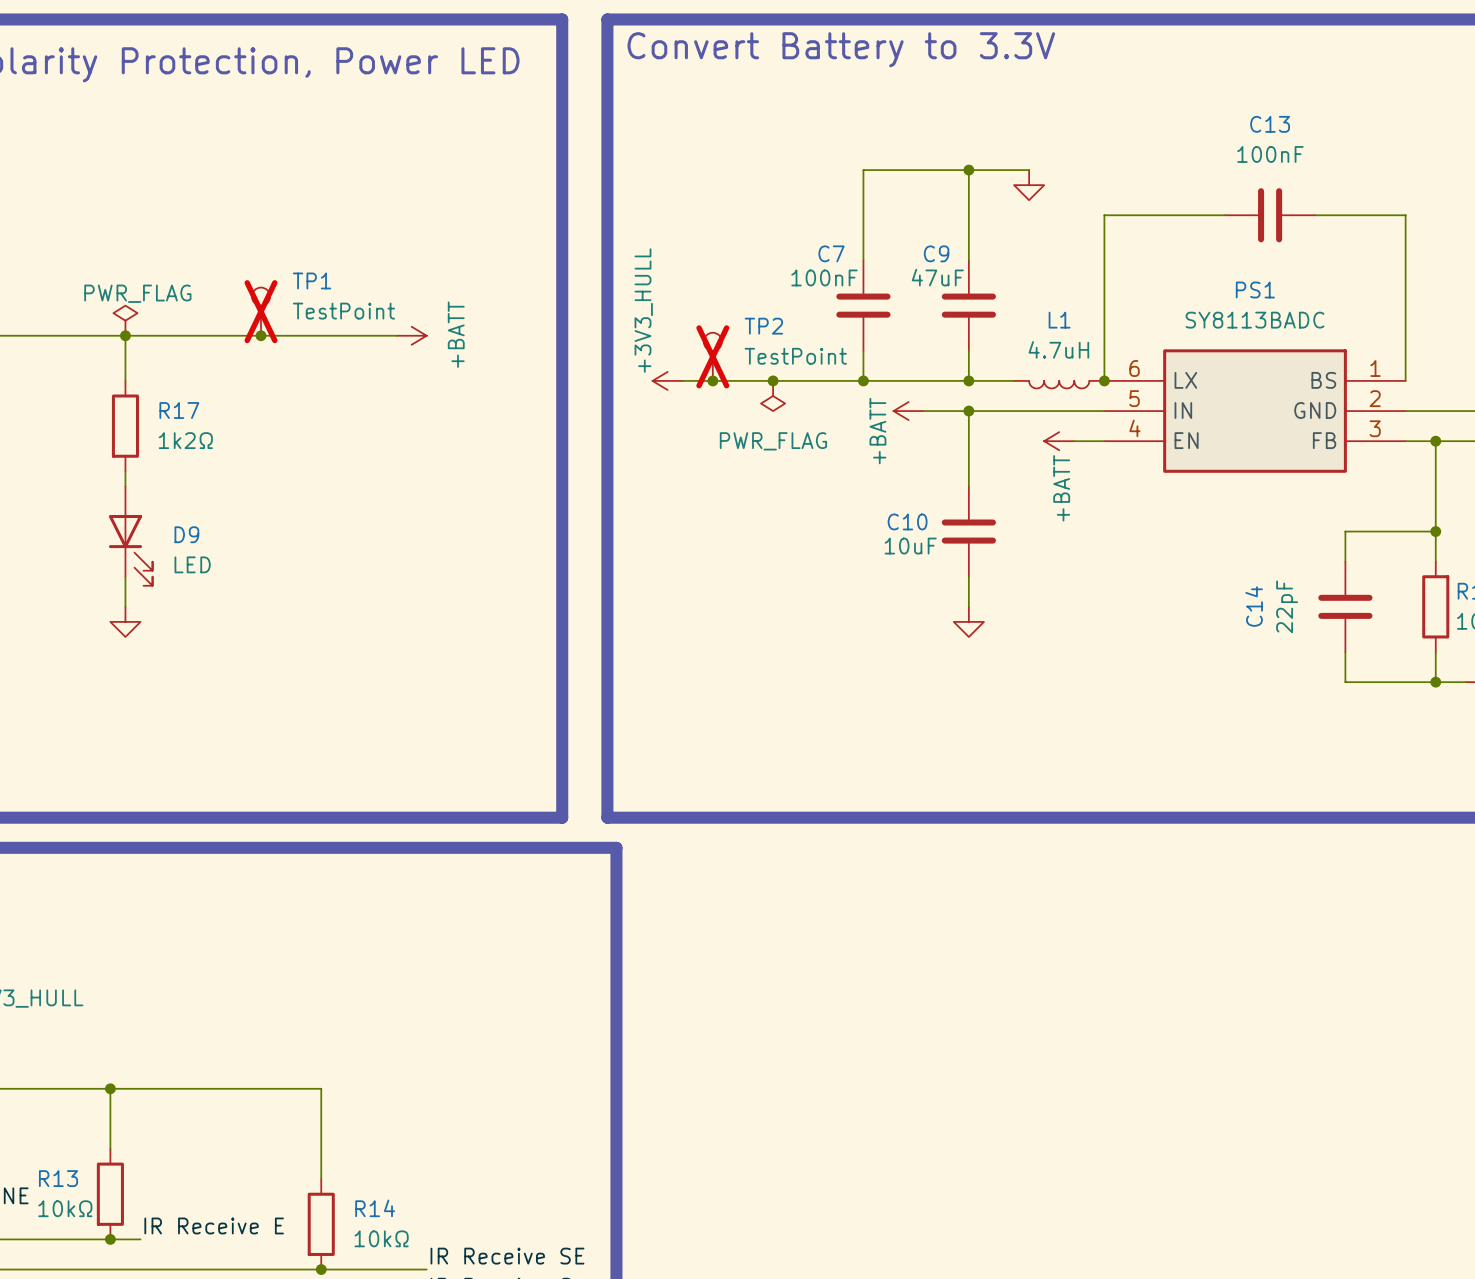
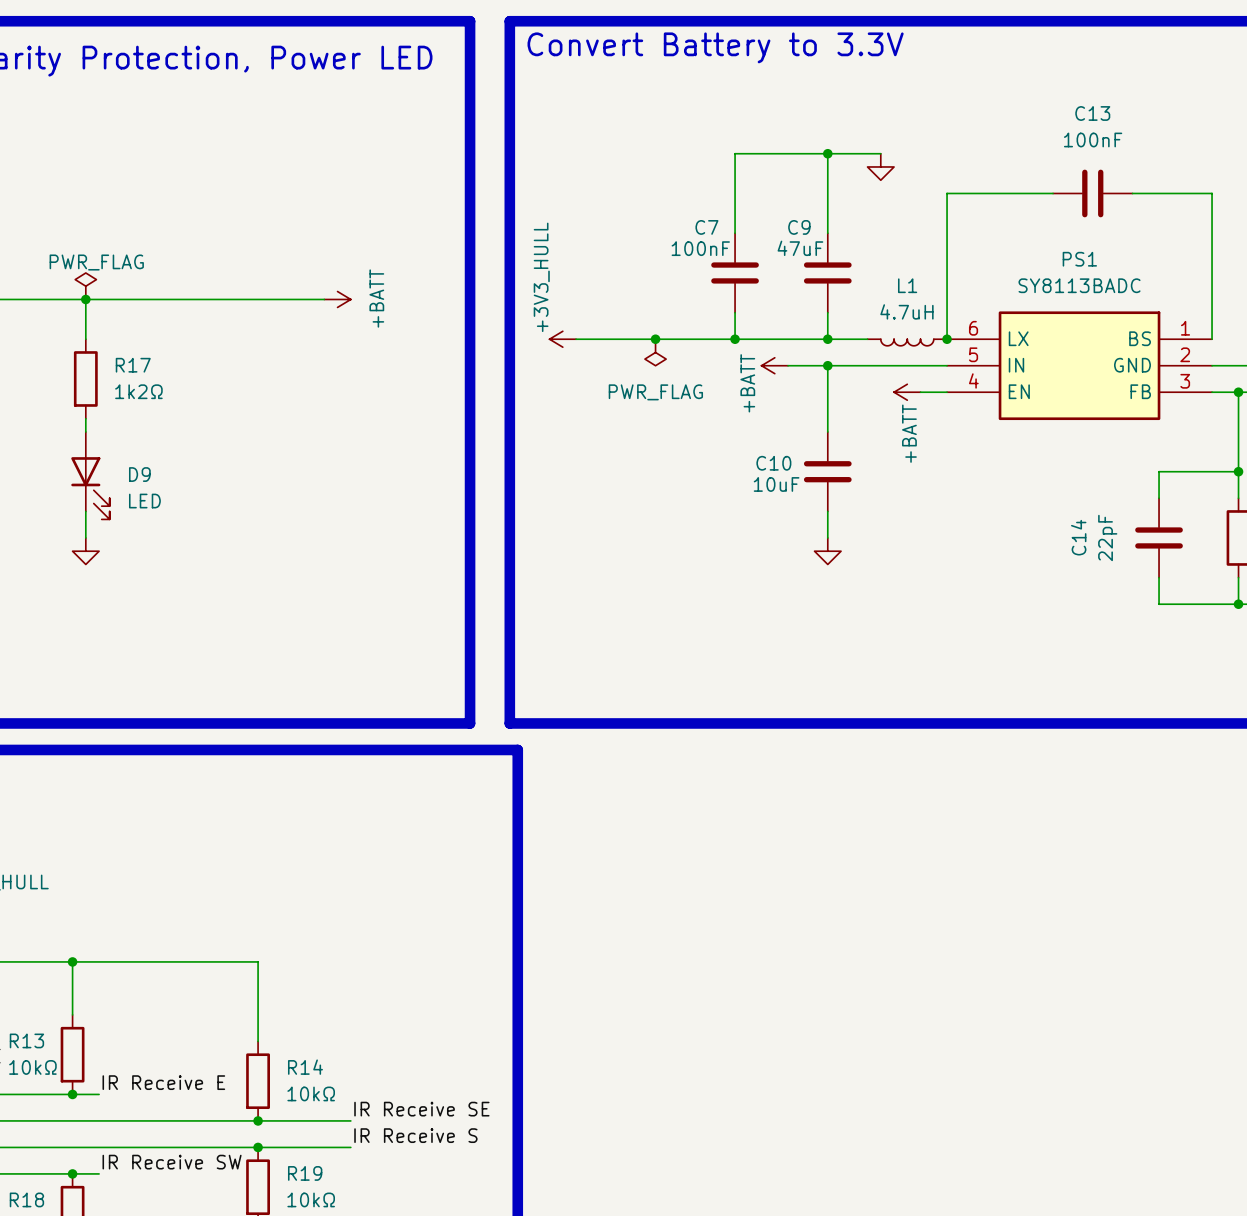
TP1: TestPoint (261, 311) -> none
junction: (261, 335) -> none
TP2: TestPoint (712, 356) -> none
junction: (712, 380) -> none

